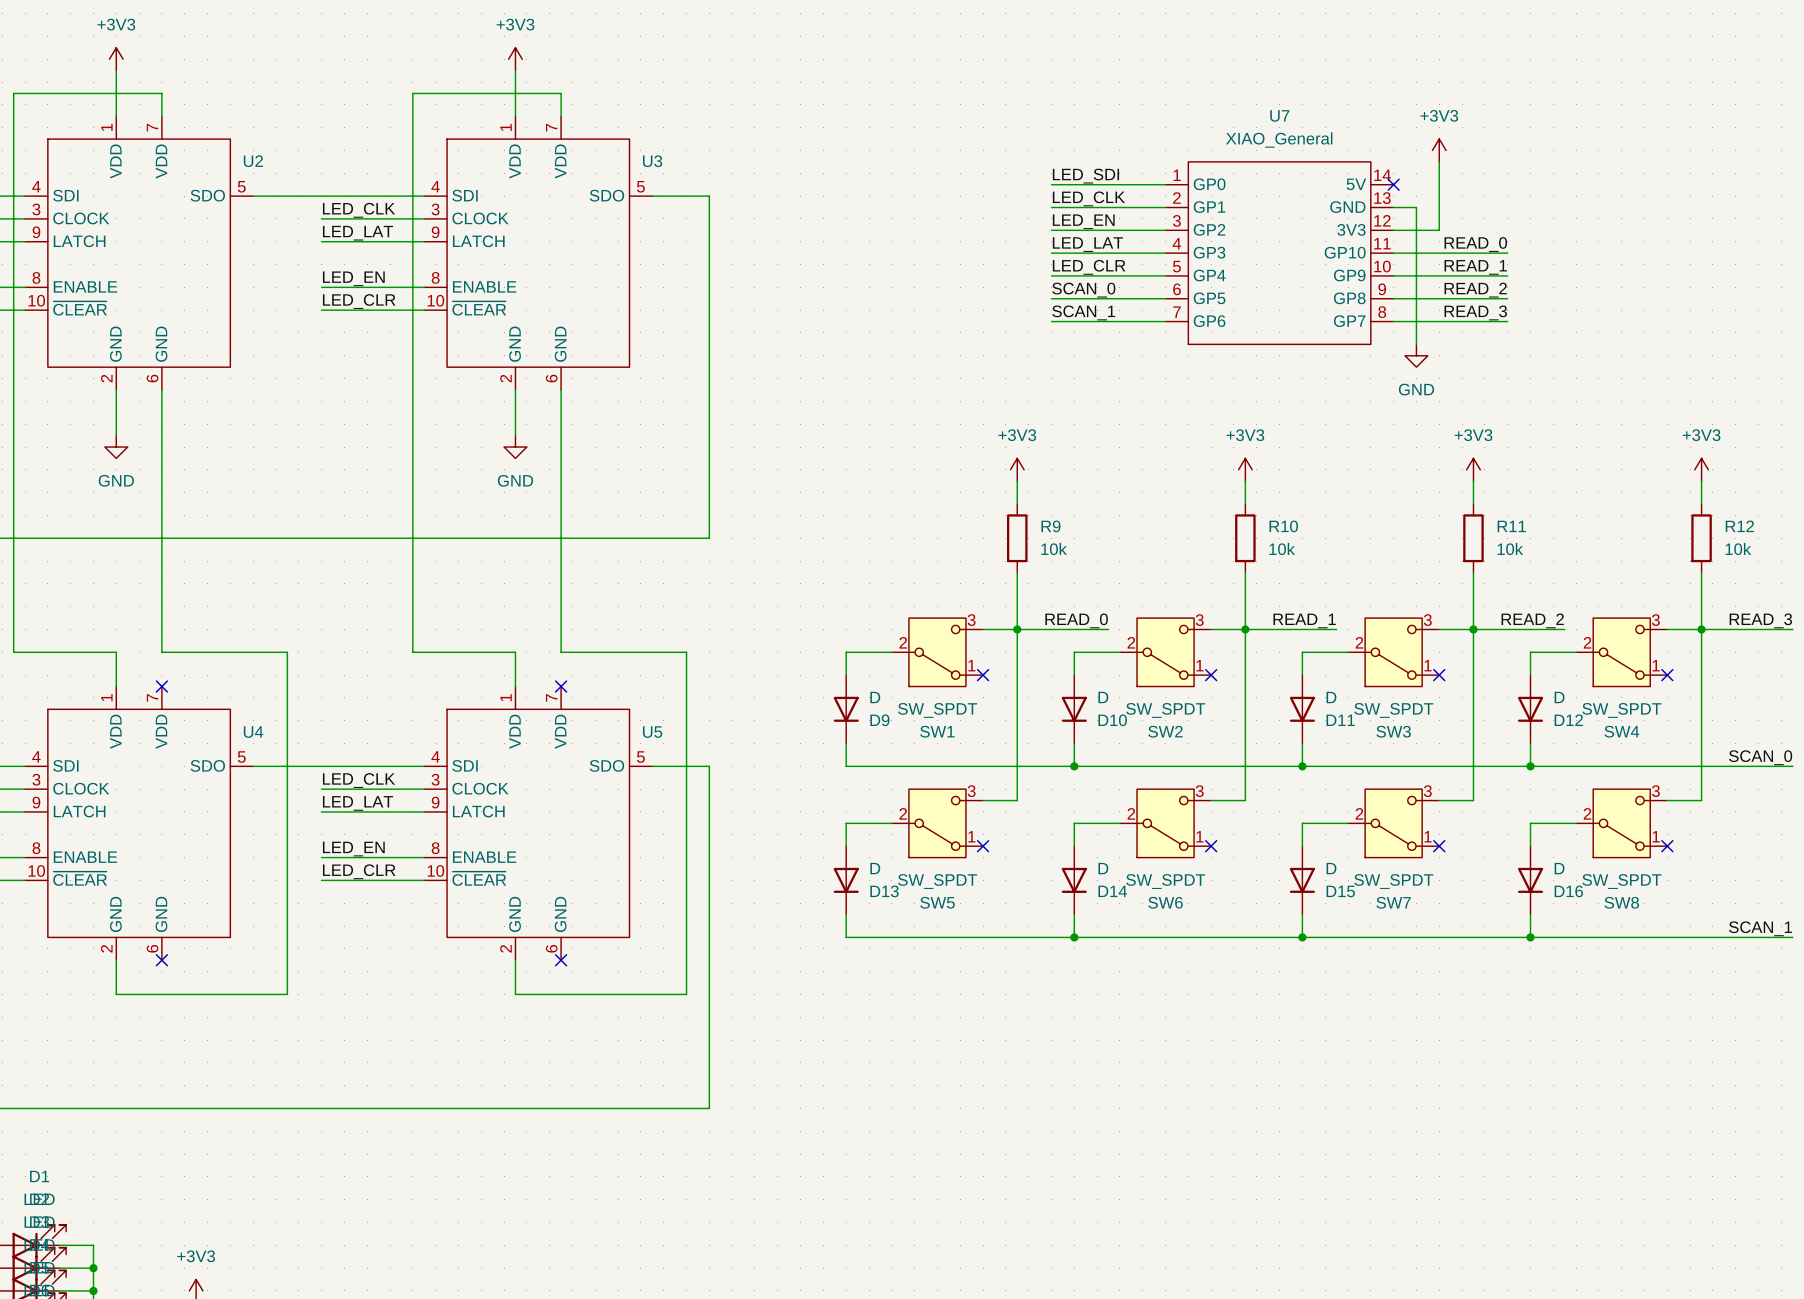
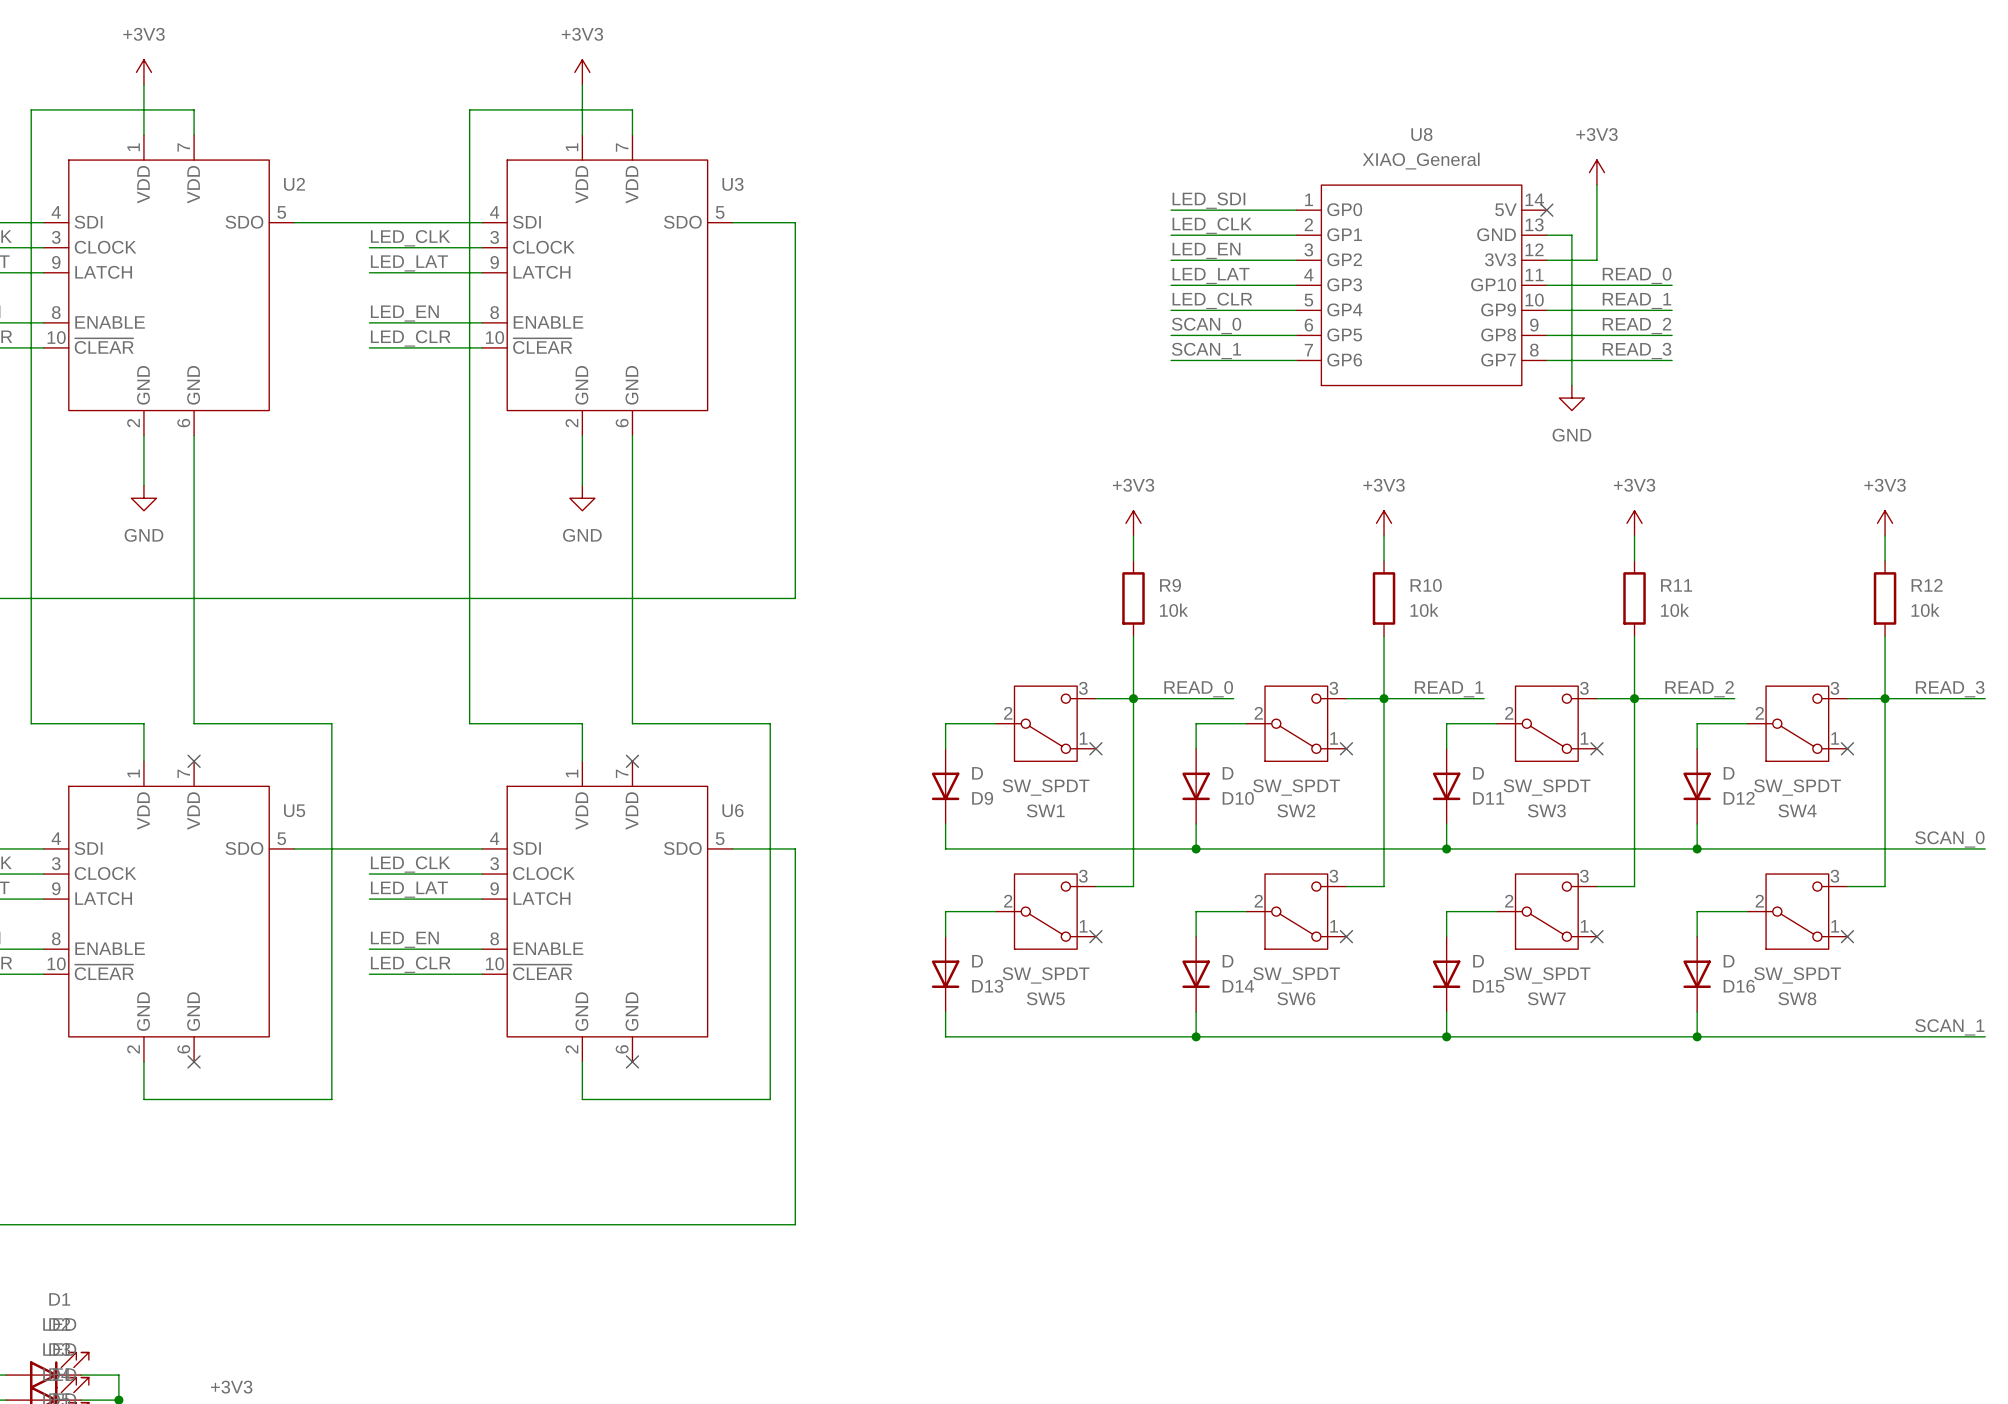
U7 name: U7 (1279, 115) -> U8 (1421, 134)
U4 name: U4 (253, 732) -> U5 (294, 810)
U5 name: U5 (652, 732) -> U6 (732, 810)

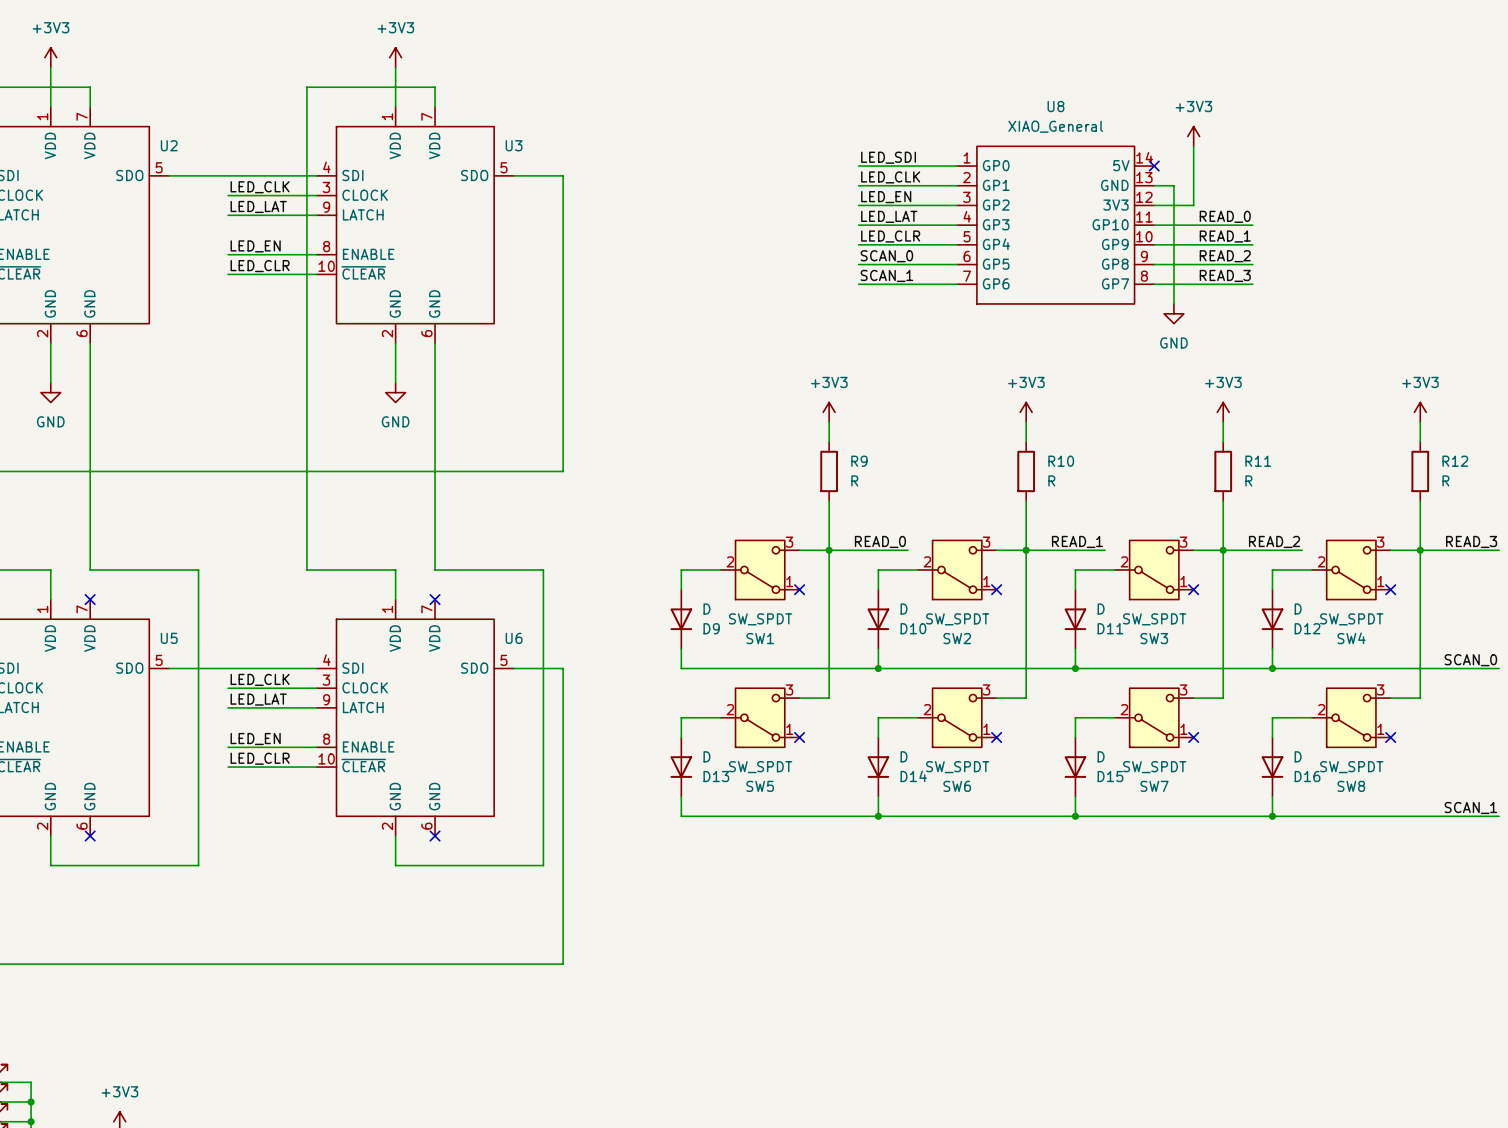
R9 value: 10k (1173, 610) -> R (854, 480)
R10 value: 10k (1424, 610) -> R (1051, 480)
R11 value: 10k (1674, 610) -> R (1248, 480)
R12 value: 10k (1925, 610) -> R (1445, 480)

